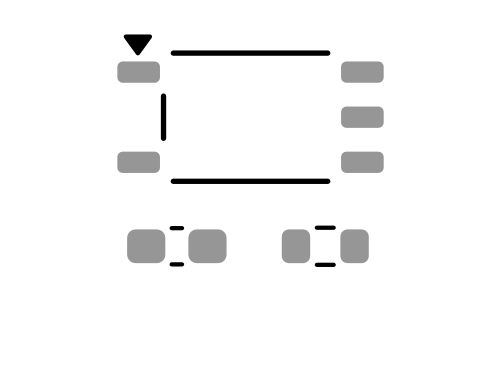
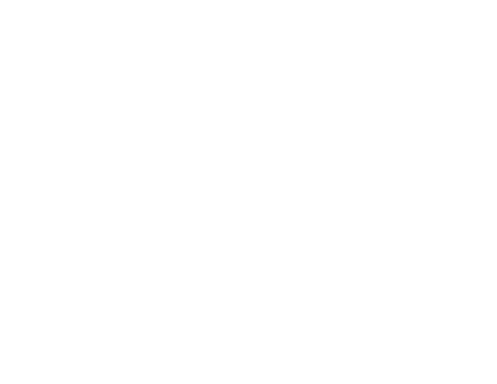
part: (250, 109) -> none
part: (176, 246) -> none
part: (325, 246) -> none

